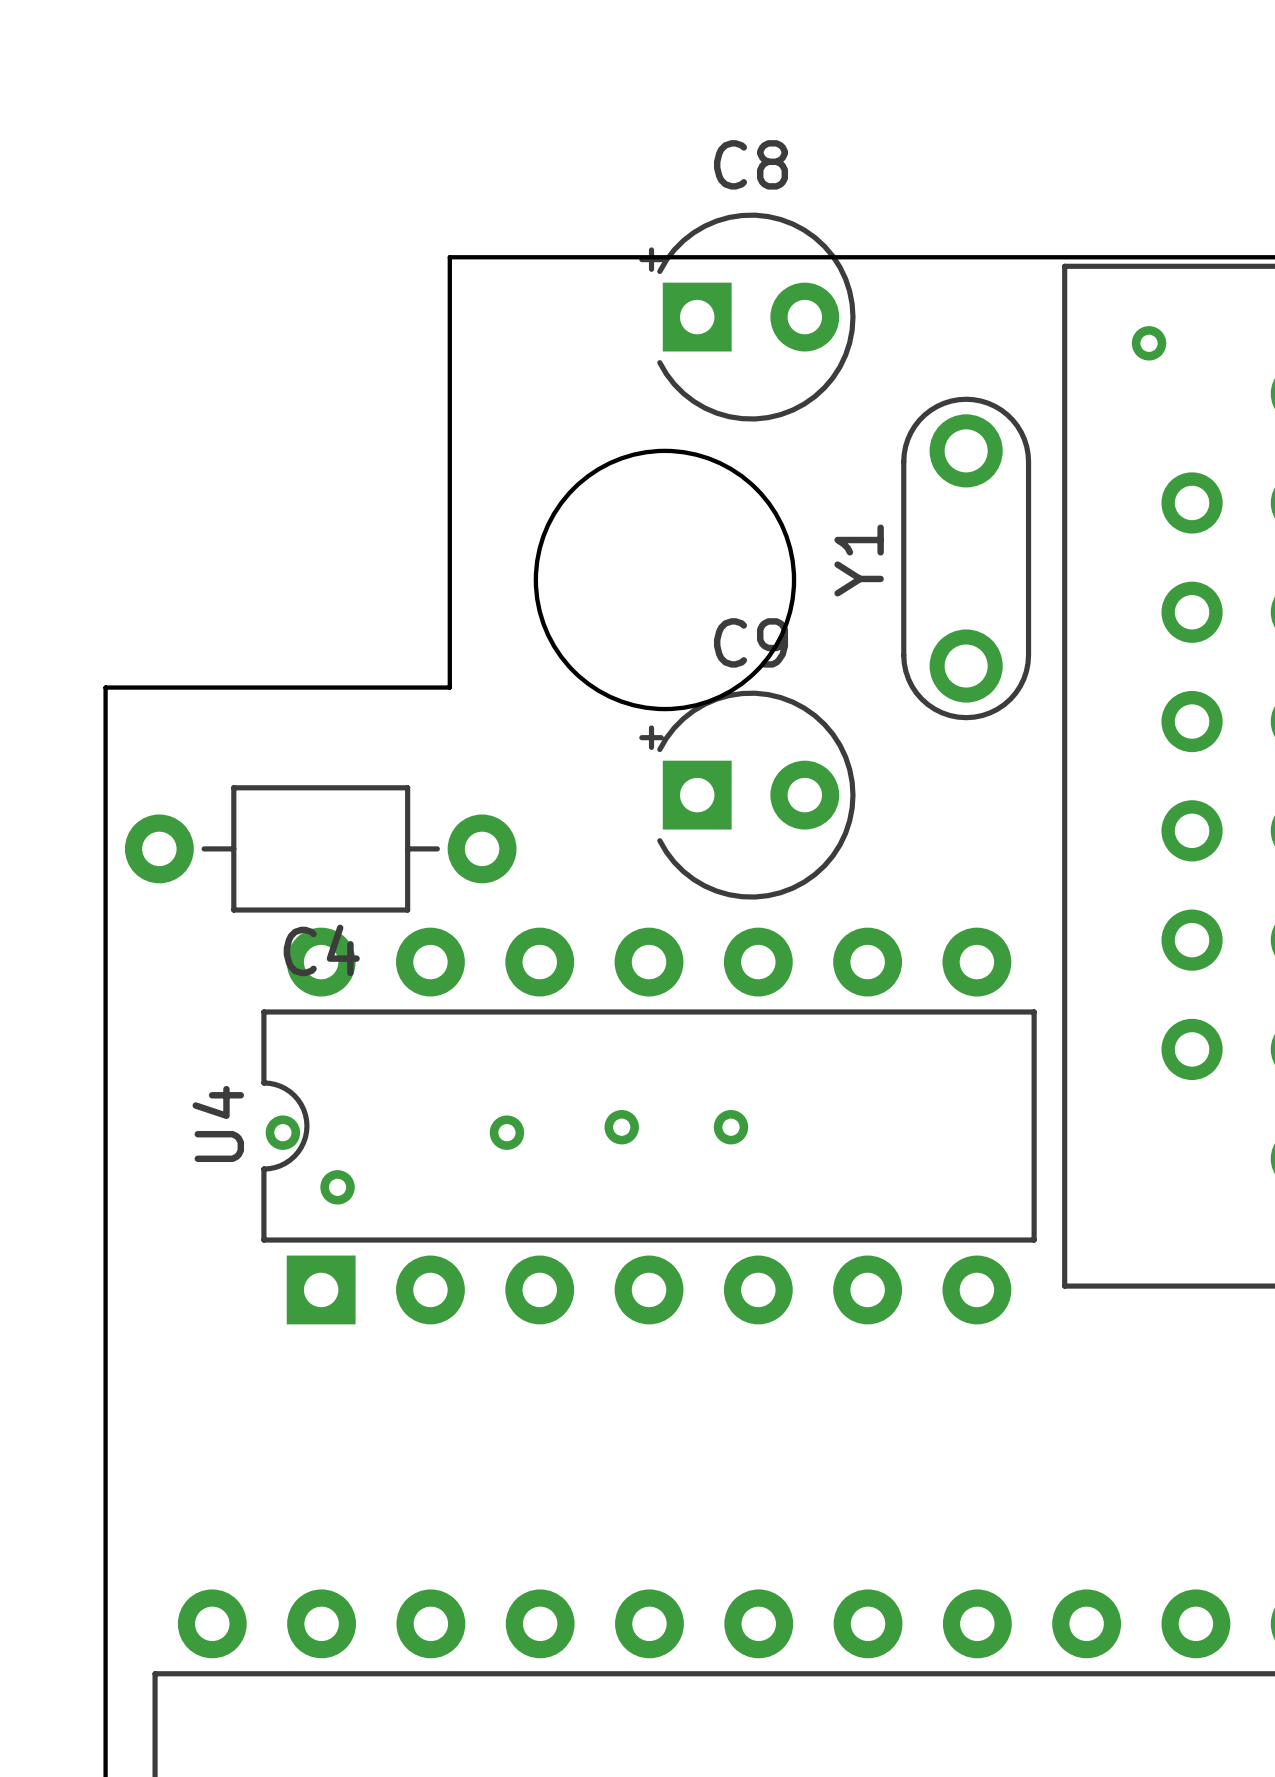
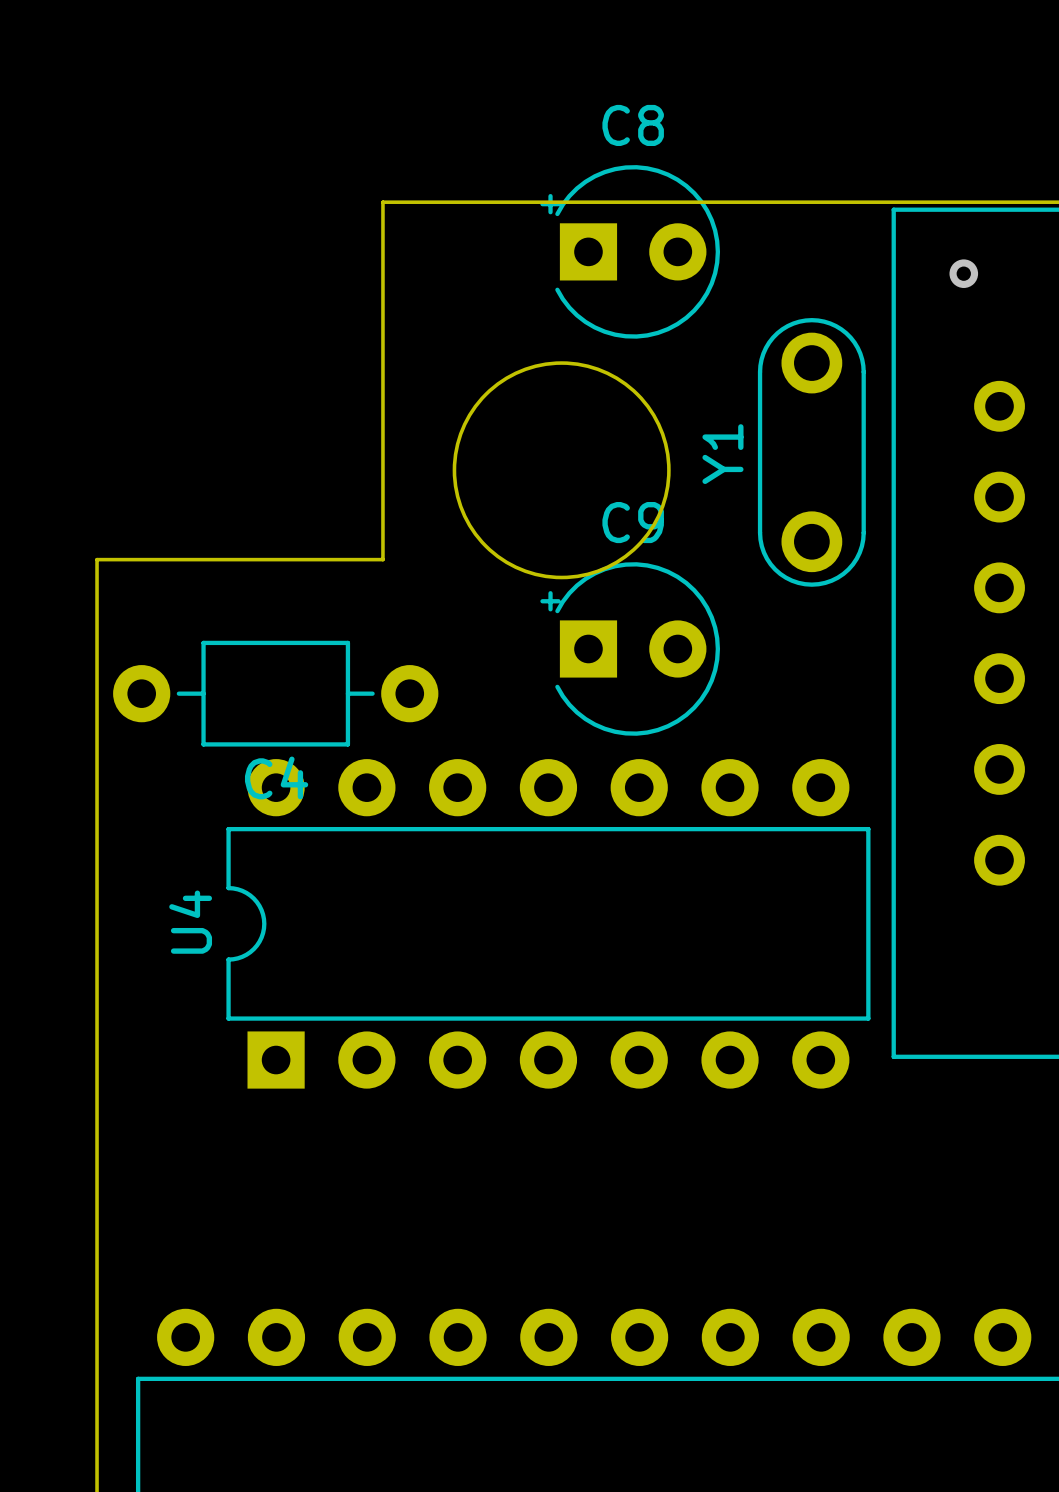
via: (621, 1127) -> none
via: (731, 1127) -> none
via: (282, 1132) -> none
via: (506, 1132) -> none
via: (337, 1187) -> none

